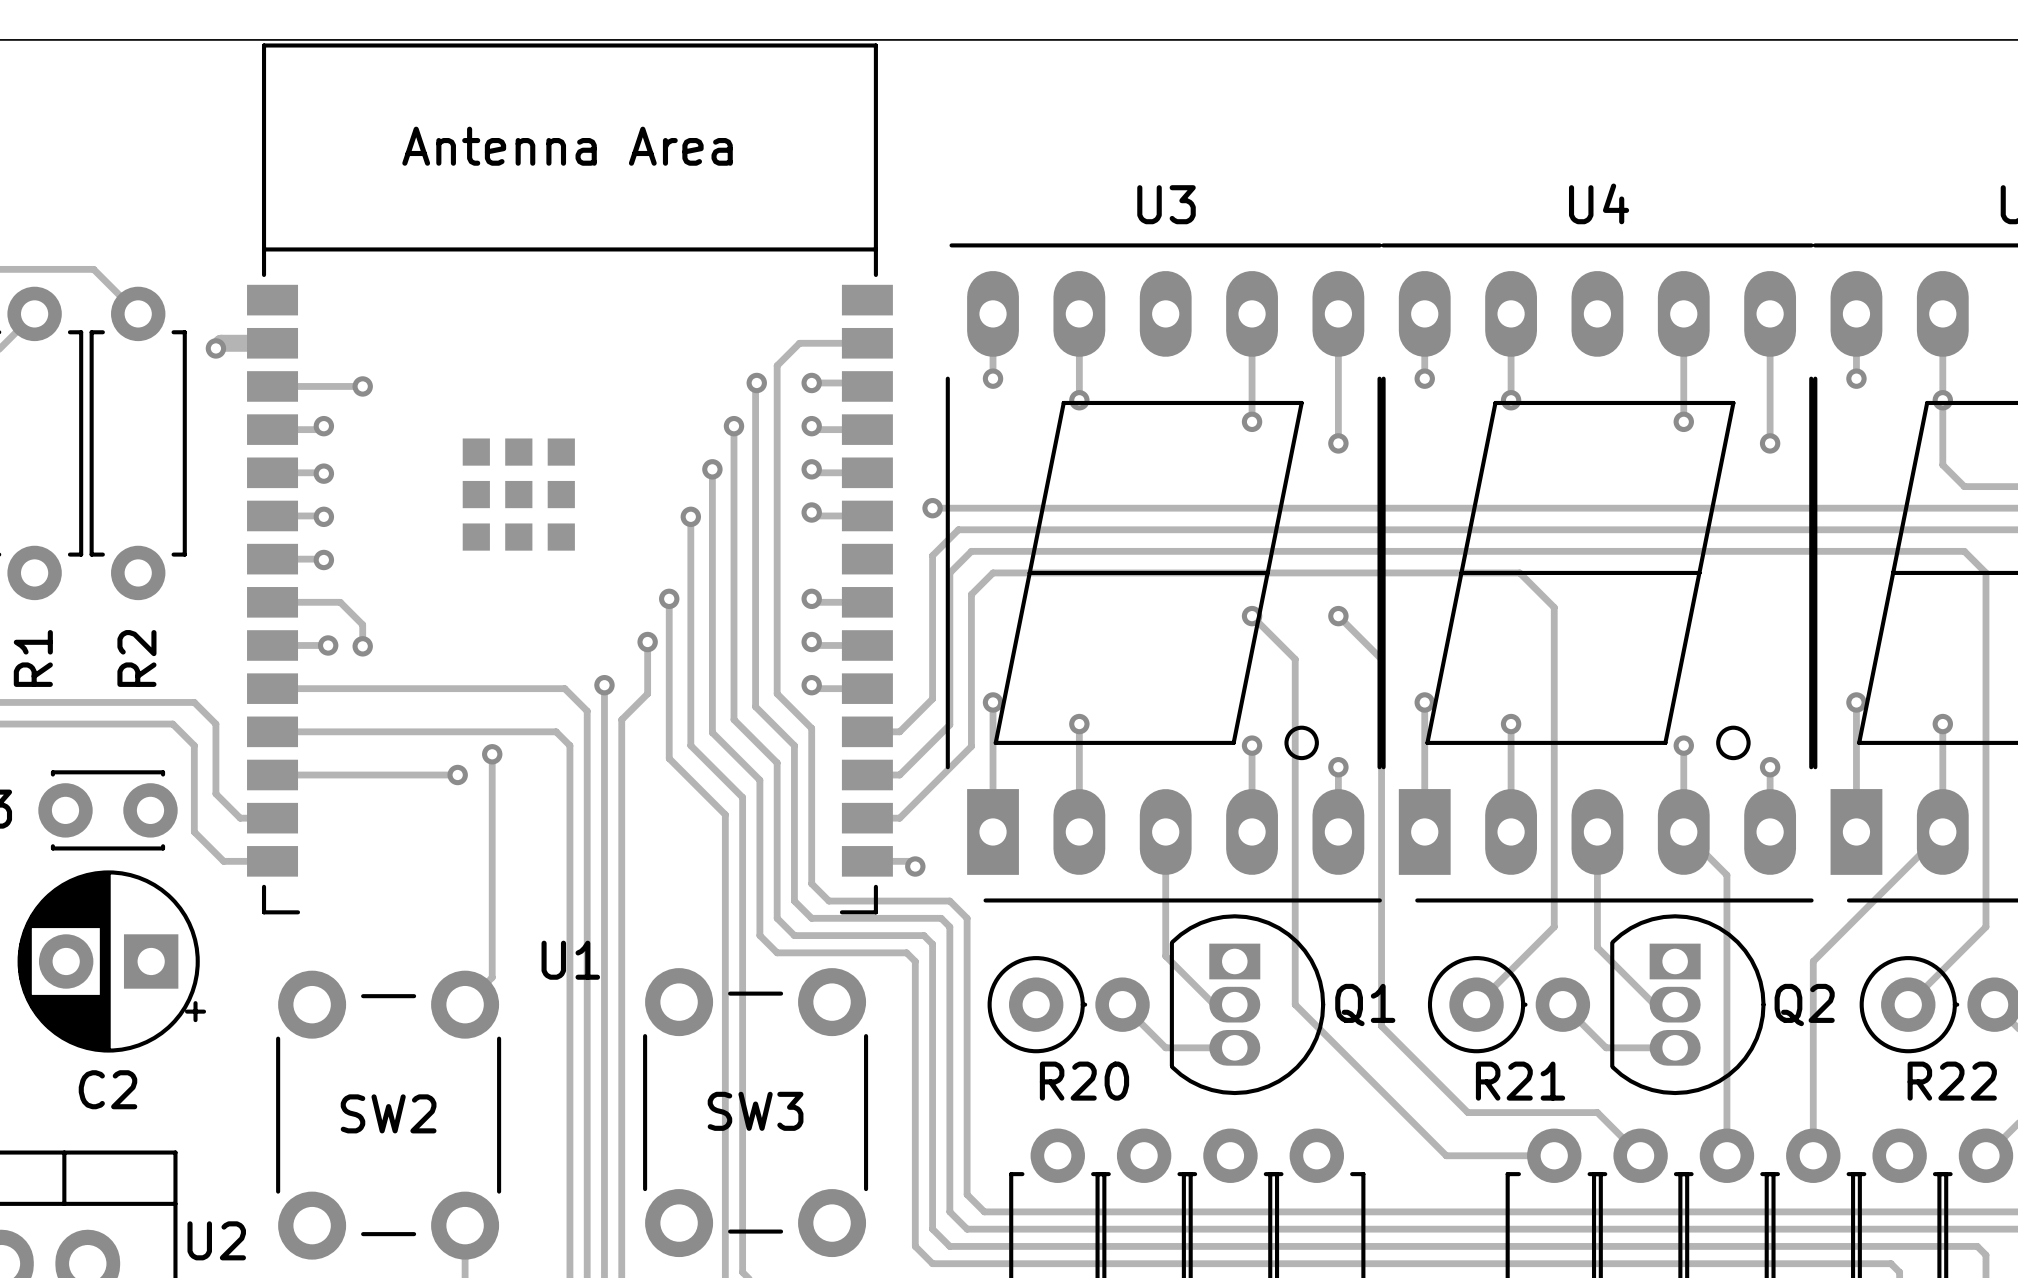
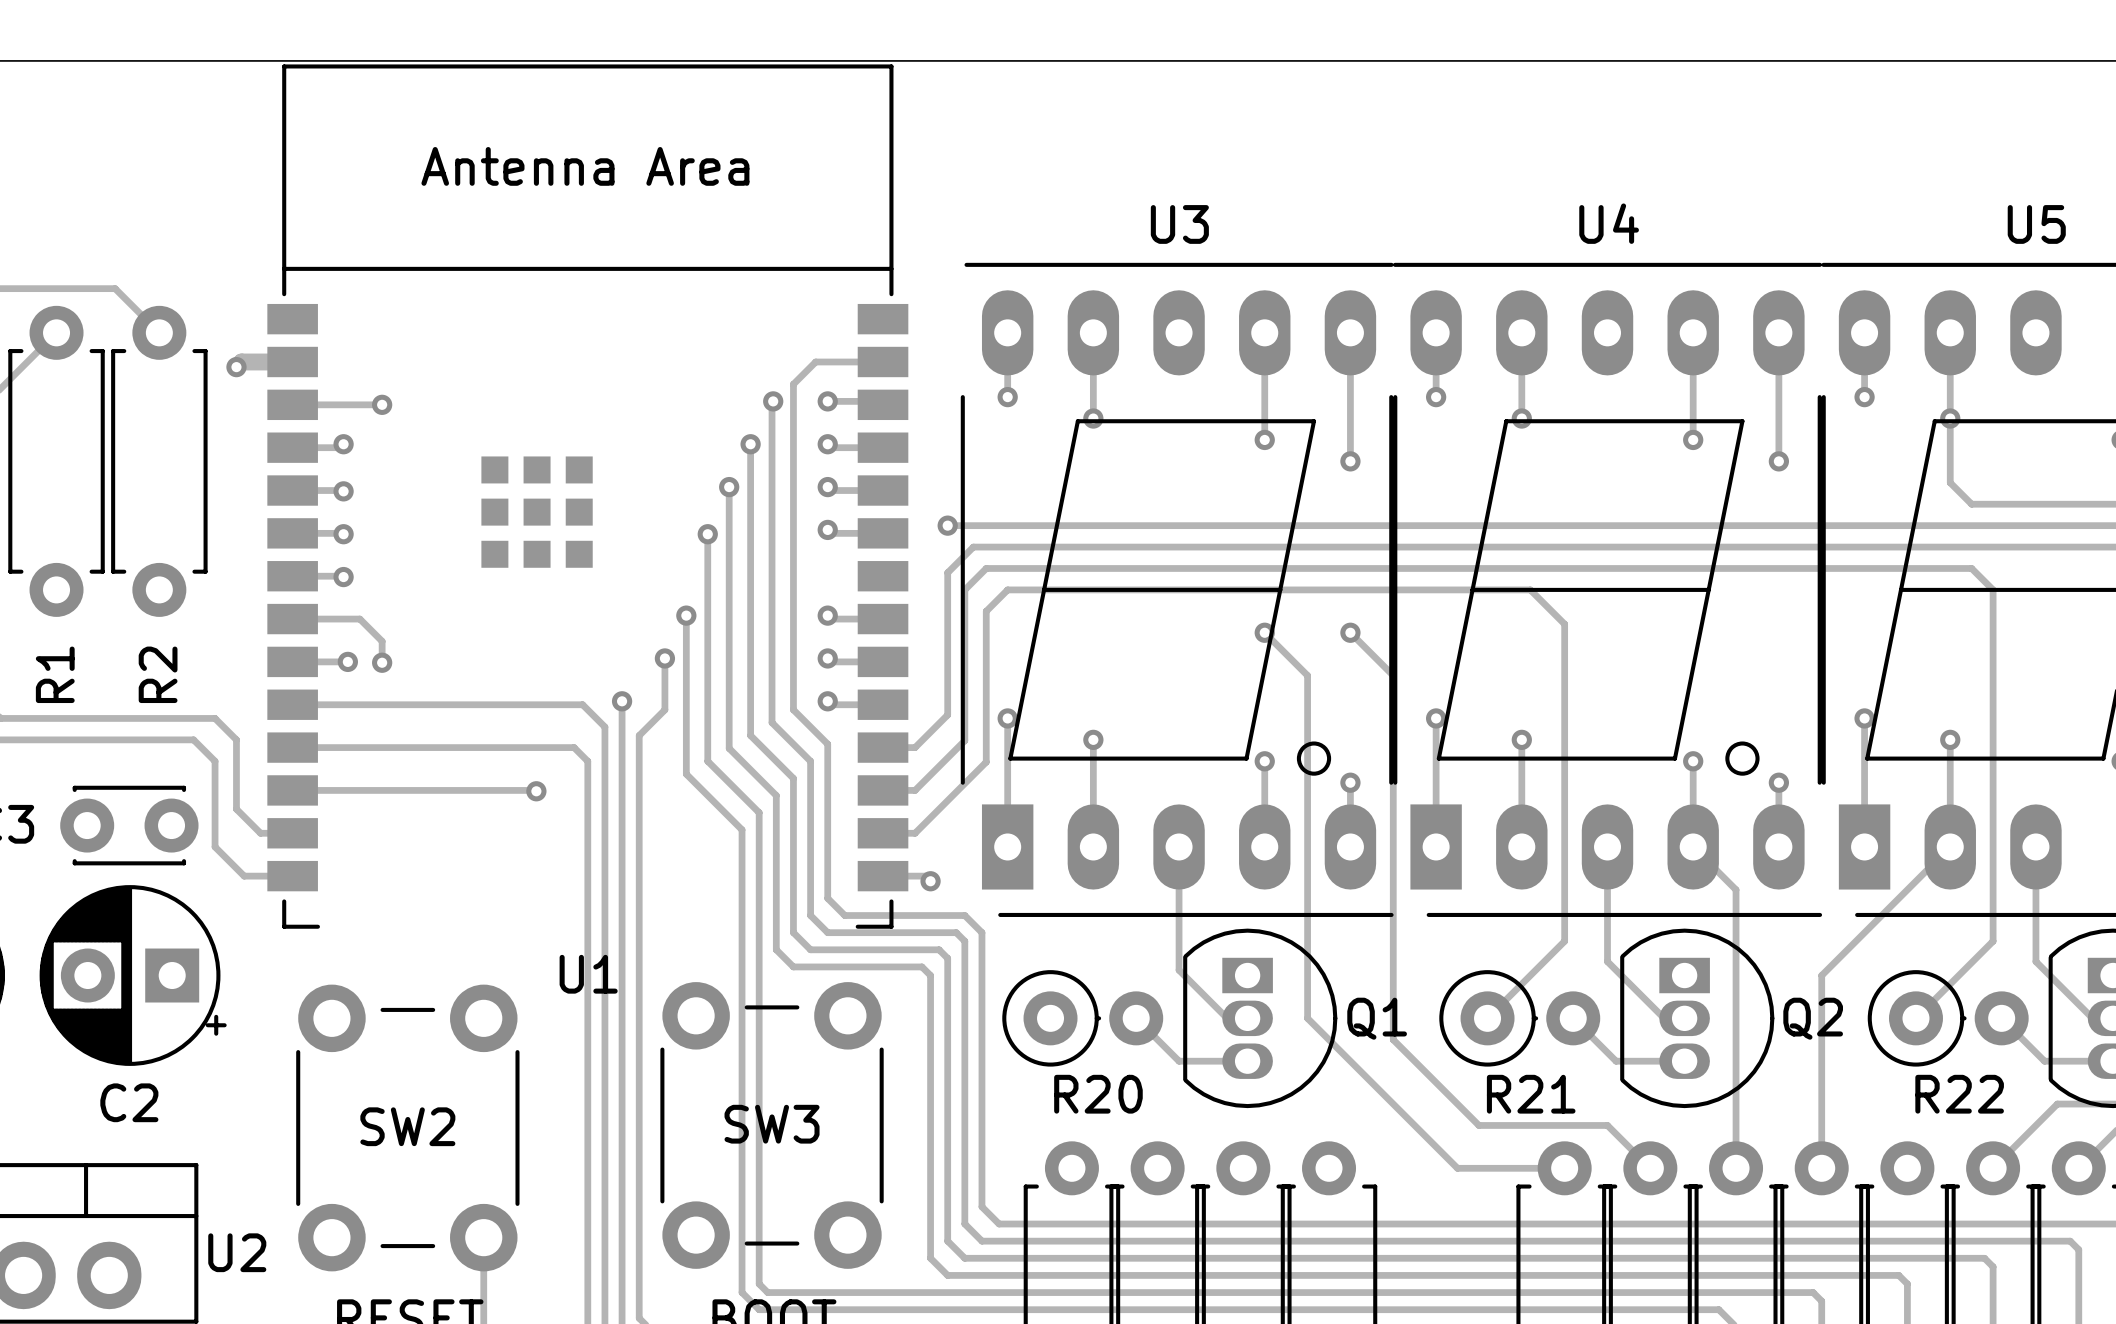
track: (492, 754) (492, 977) (465, 1004) -> none
via: (492, 754) -> none
track: none -> (476, 790) (536, 791)
via: (457, 775) -> none
via: none -> (536, 791)

